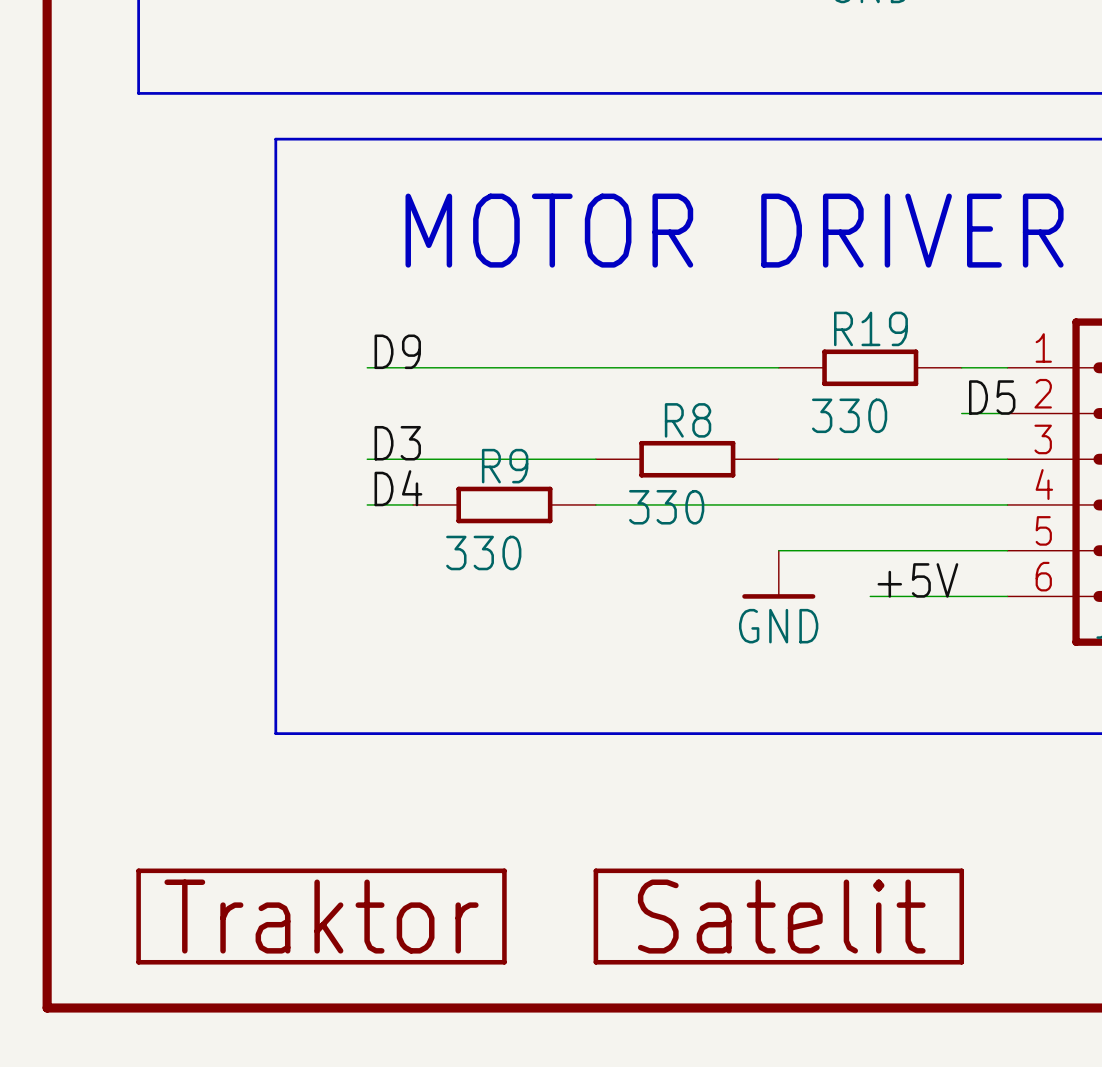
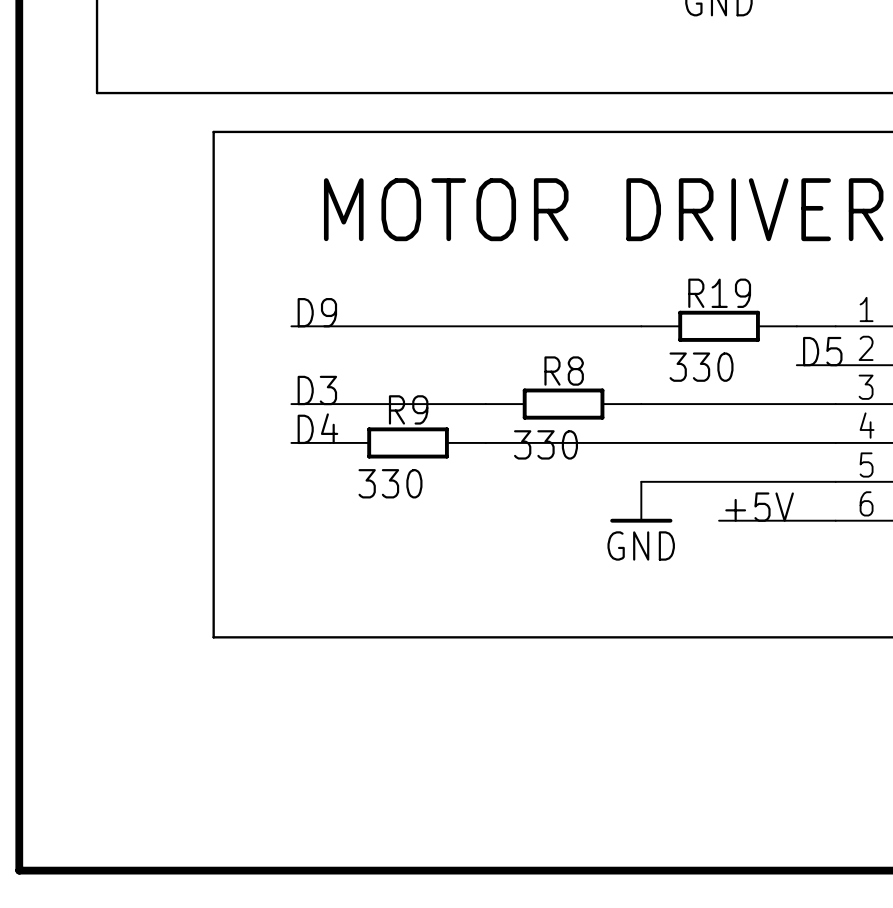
part: (321, 916) -> none
part: (778, 916) -> none

